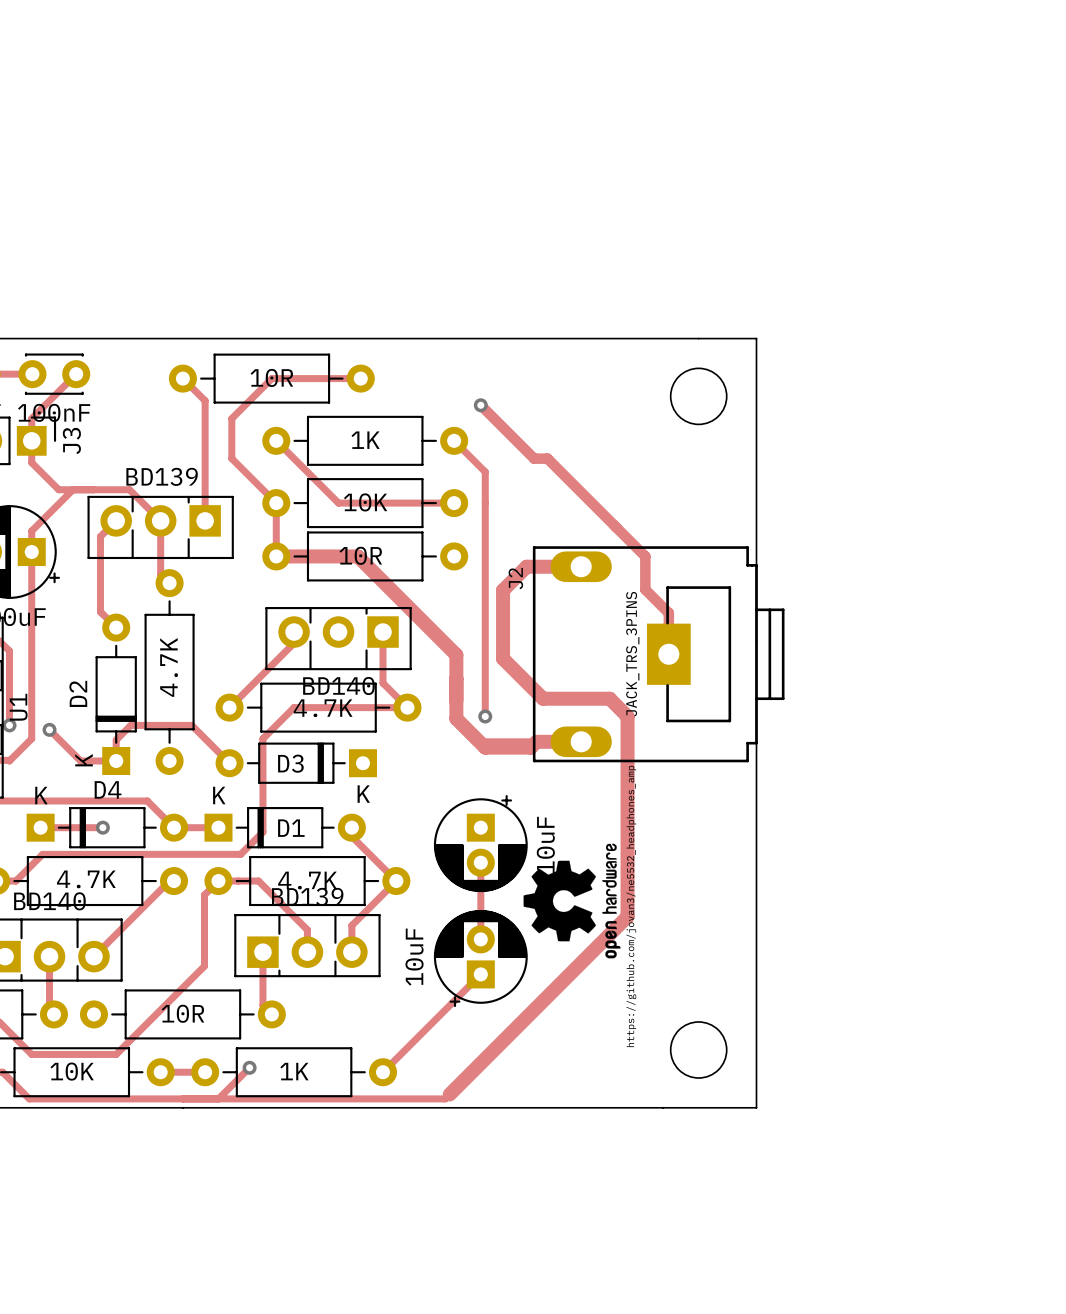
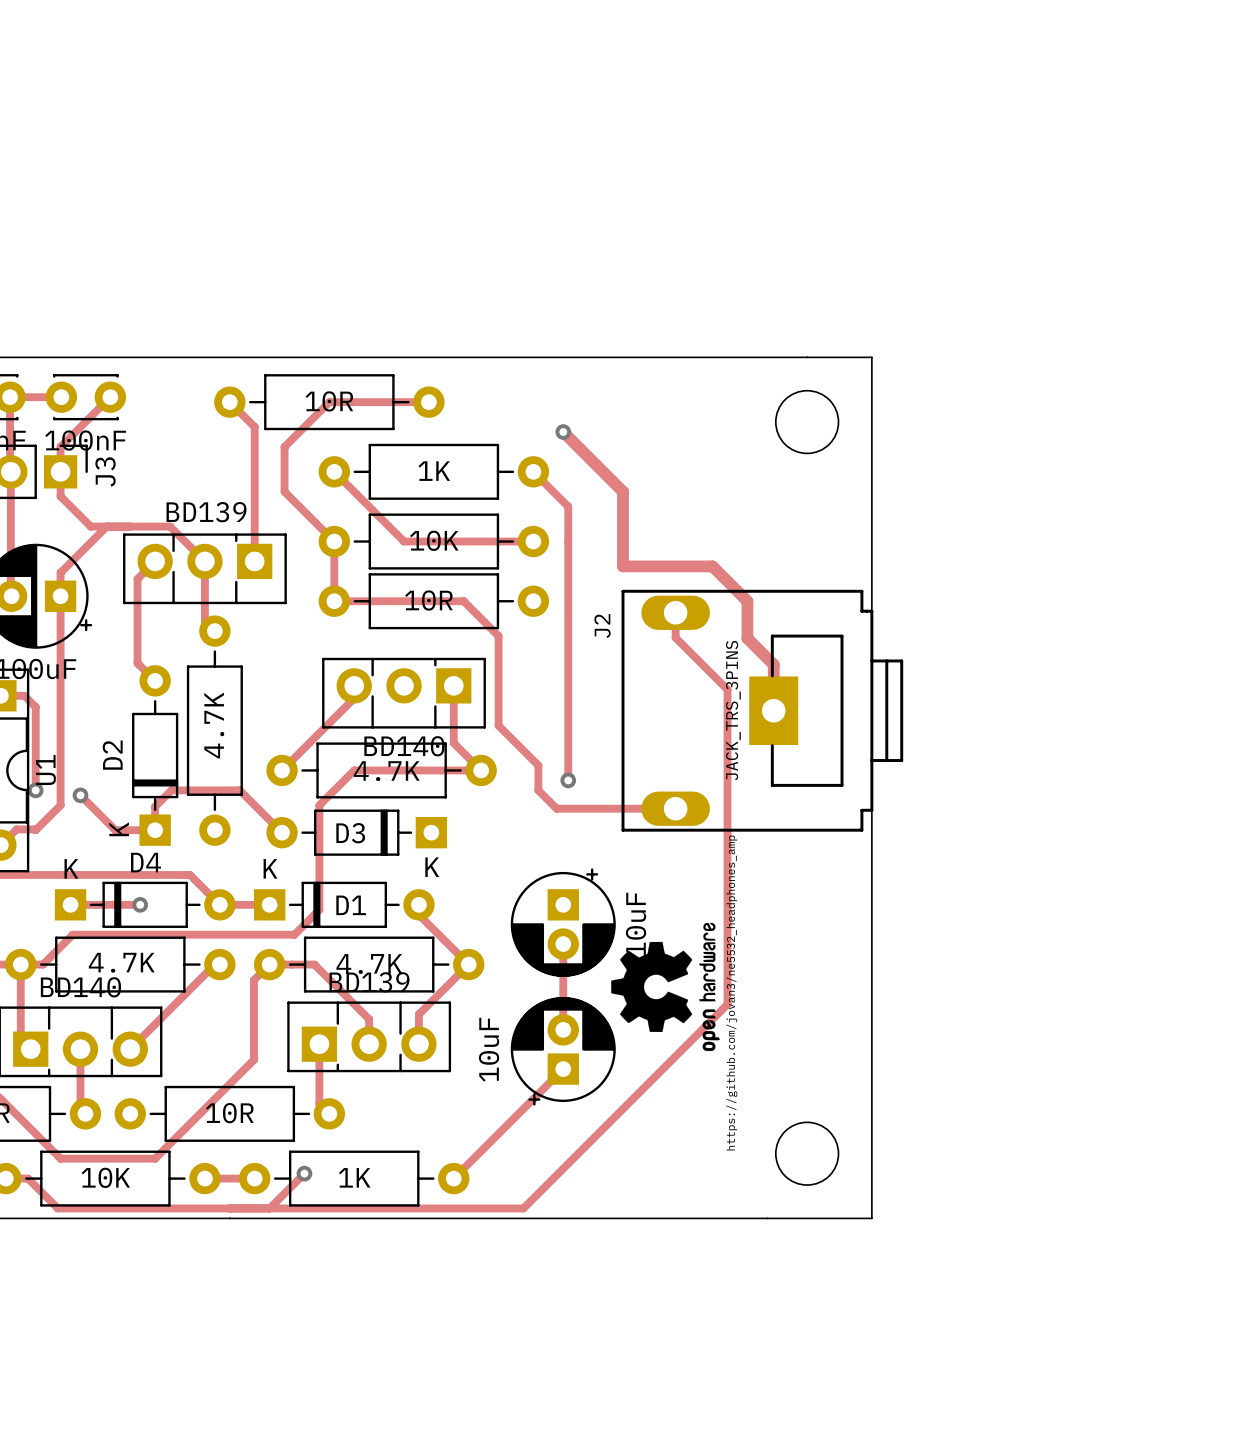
track: (534, 458) (547, 458) (614, 525) -> (623, 491) (623, 566) (712, 566)
track width: thick (276, 556) (357, 556) -> thin (334, 601) (425, 601)
track: (357, 556) (456, 654) (456, 718) (485, 747) (530, 747) (536, 741) (581, 741) -> (425, 601) (463, 601) (498, 636) (498, 725) (535, 762)
track: (581, 566) (526, 566) (503, 590) (503, 658) (543, 698) (609, 698) (627, 716) -> (675, 612) (675, 637) (727, 689) (727, 780)
track width: thick (627, 716) (627, 916) (449, 1094) -> thin (727, 780) (727, 1004) (528, 1203)

